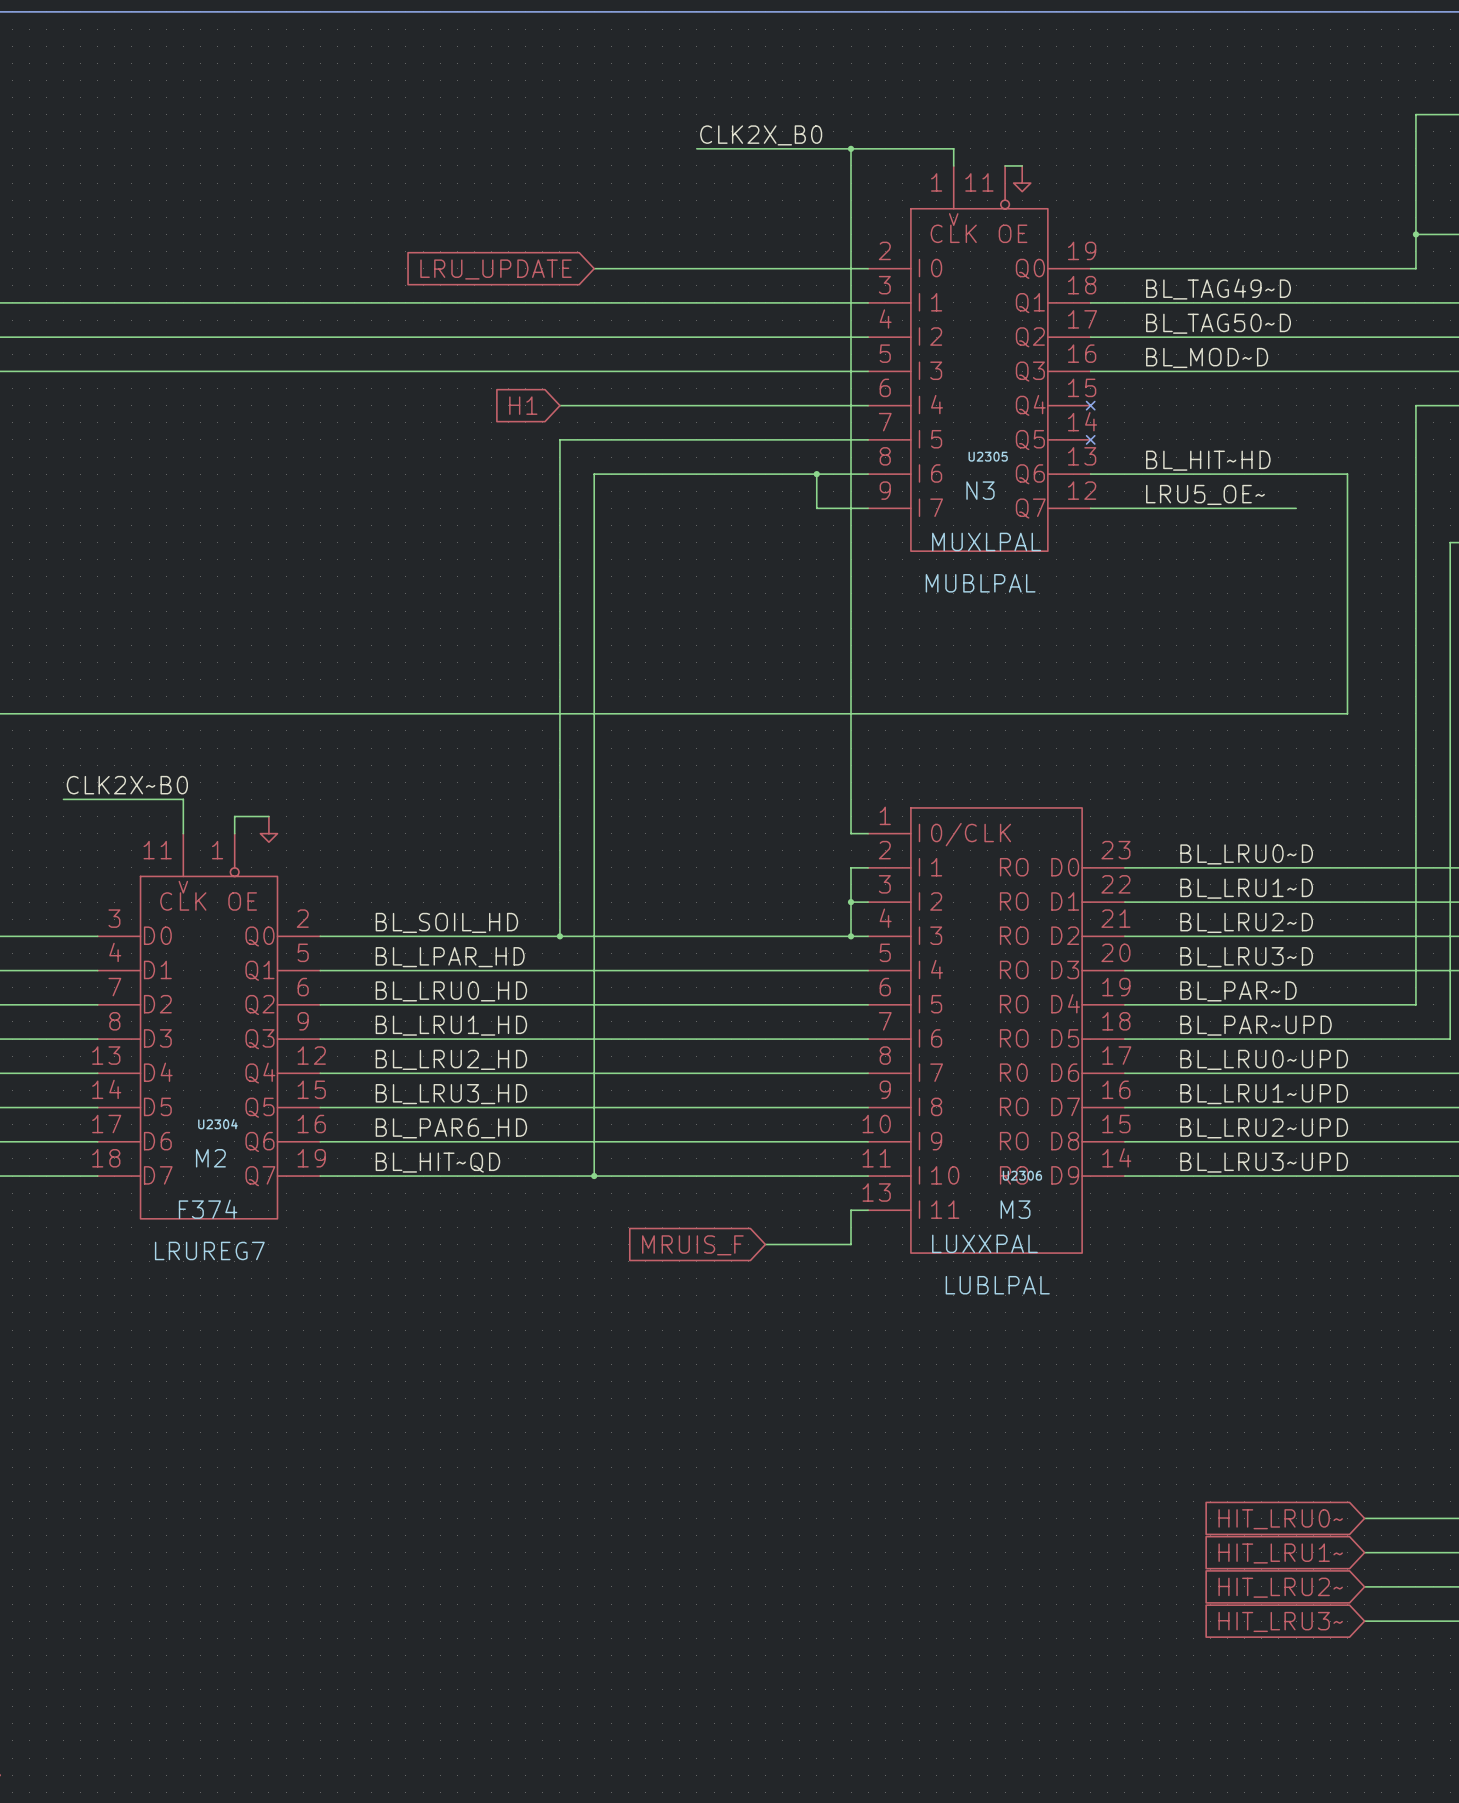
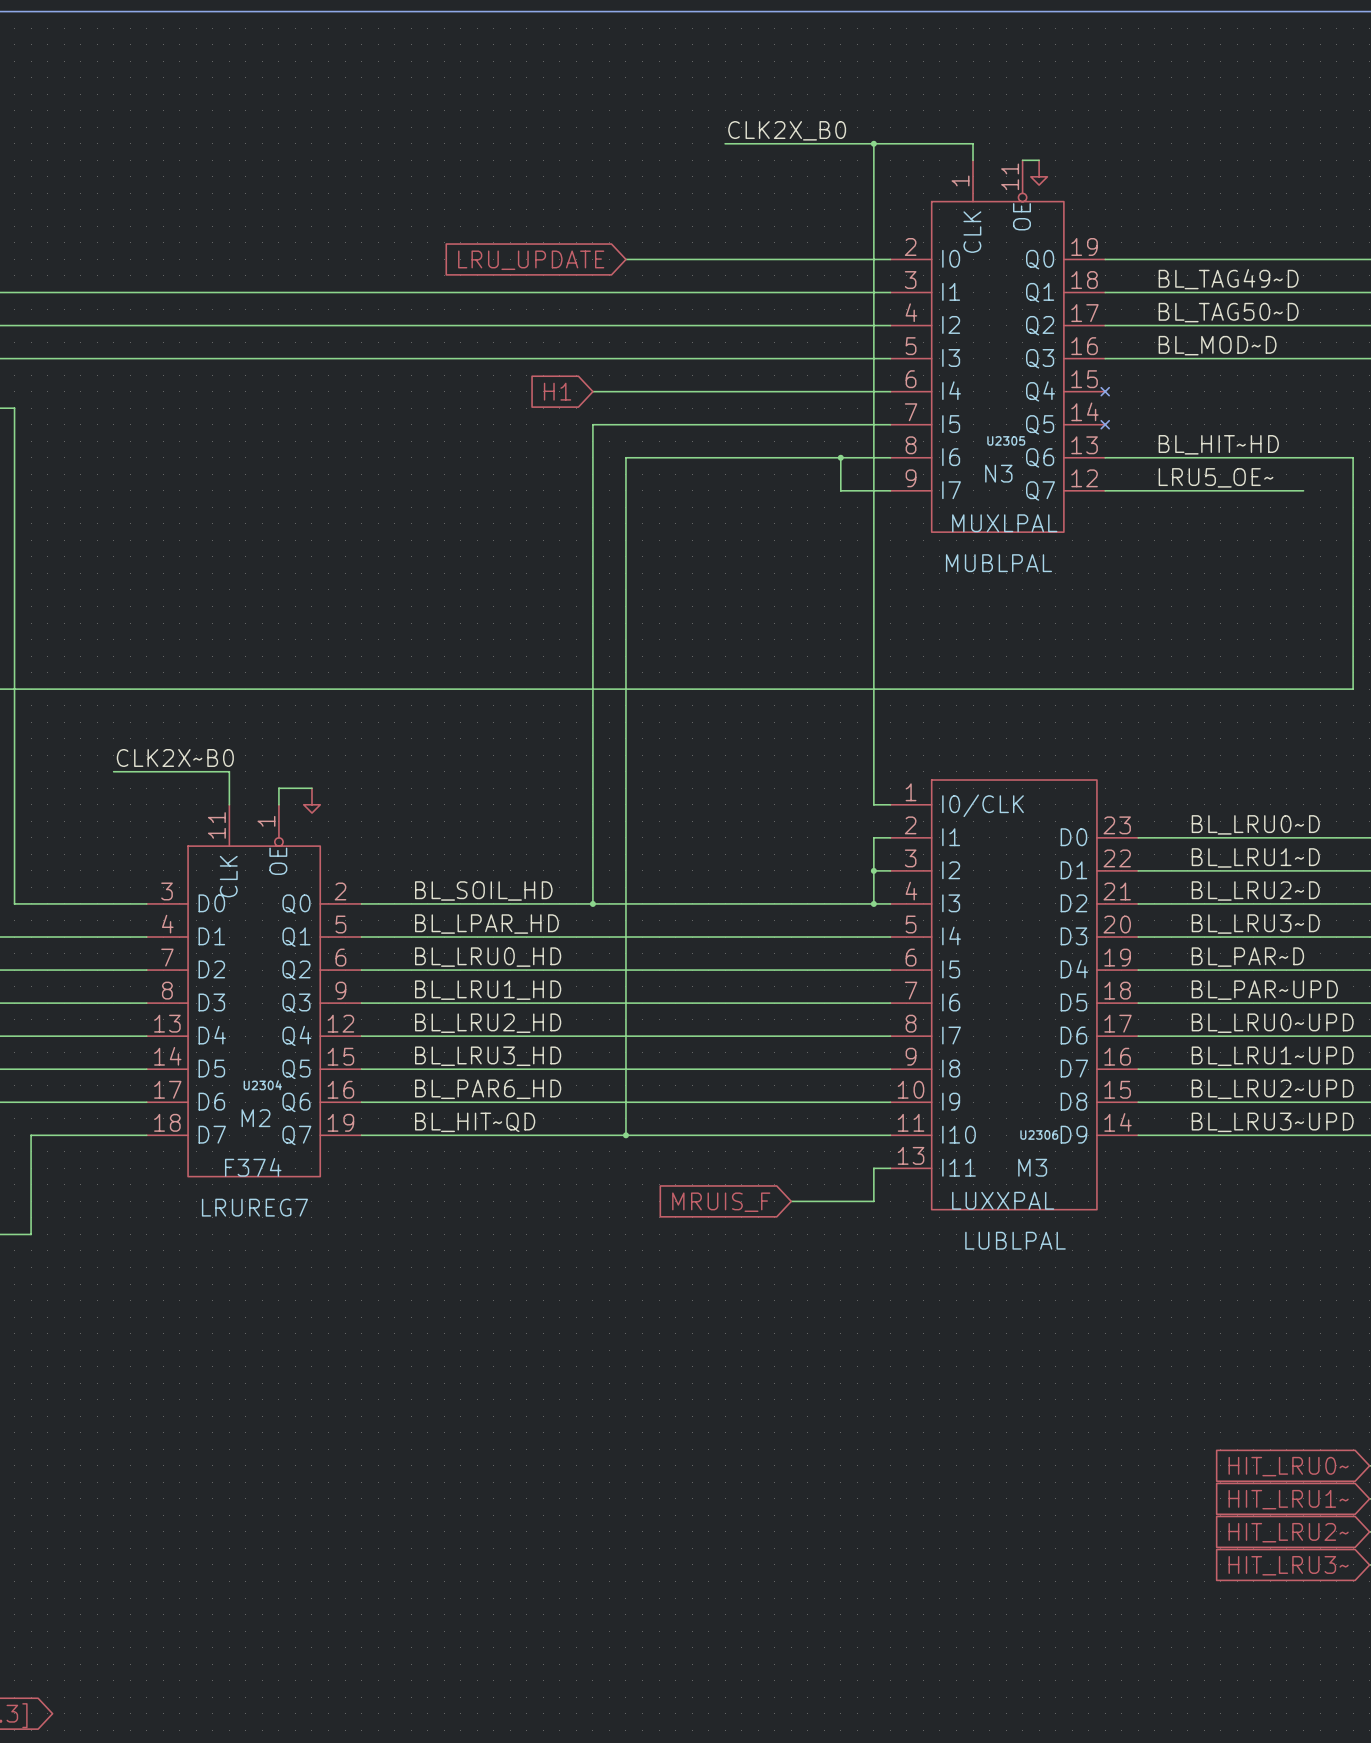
U2305 symbol: [868, 165, 1091, 552] -> [890, 160, 1106, 533]
U2306 symbol: [868, 807, 1125, 1254] -> [890, 780, 1139, 1210]
U2304 symbol: [97, 833, 321, 1219] -> [146, 804, 362, 1177]

